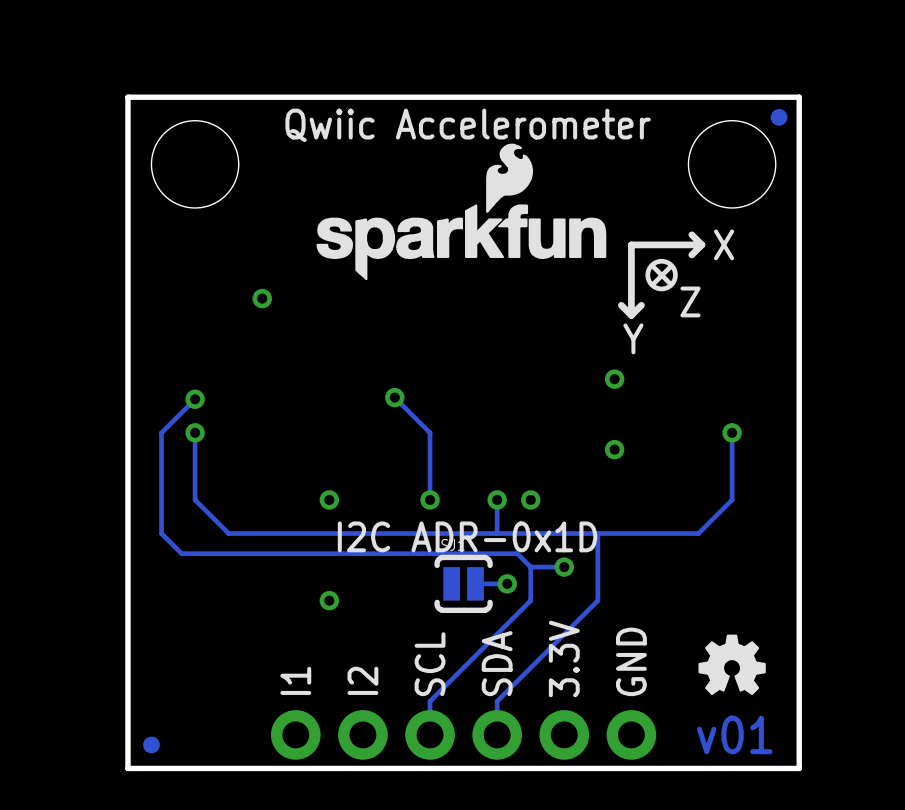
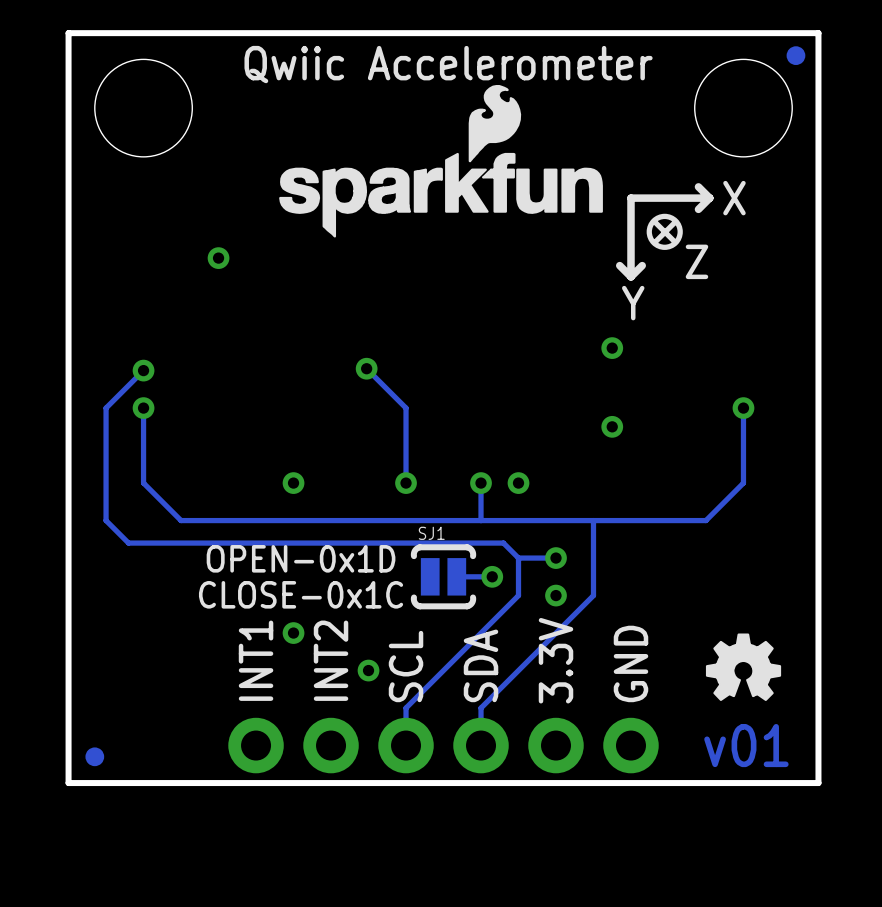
text: I2C ADR-0x1D (467, 536) -> none
text: none -> OPEN-0x1D (301, 558)
text: none -> CLOSE-0x1C (301, 594)
via position: (329, 600) -> (293, 633)
via: none -> (556, 595)
via: none -> (368, 670)
text: I1 (295, 680) -> INT1 (256, 660)
text: I2 (362, 680) -> INT2 (331, 660)

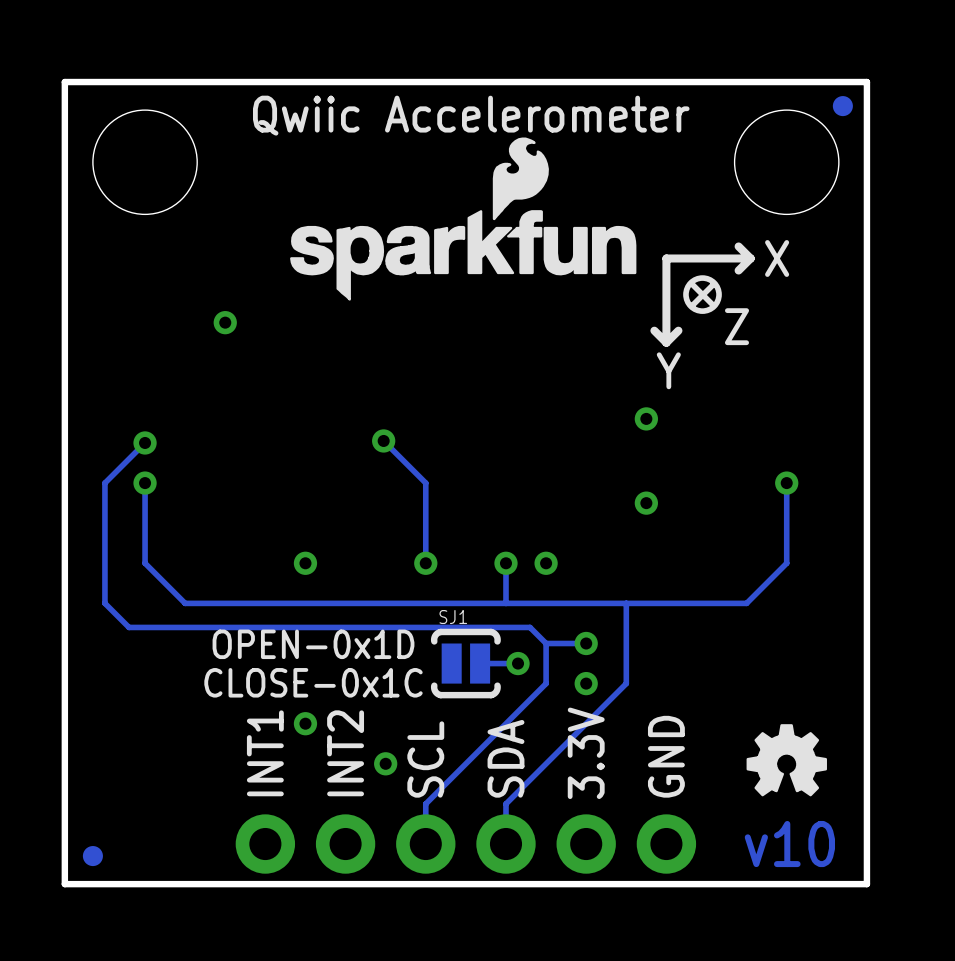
text: v01 (746, 745) -> v10 (789, 844)

